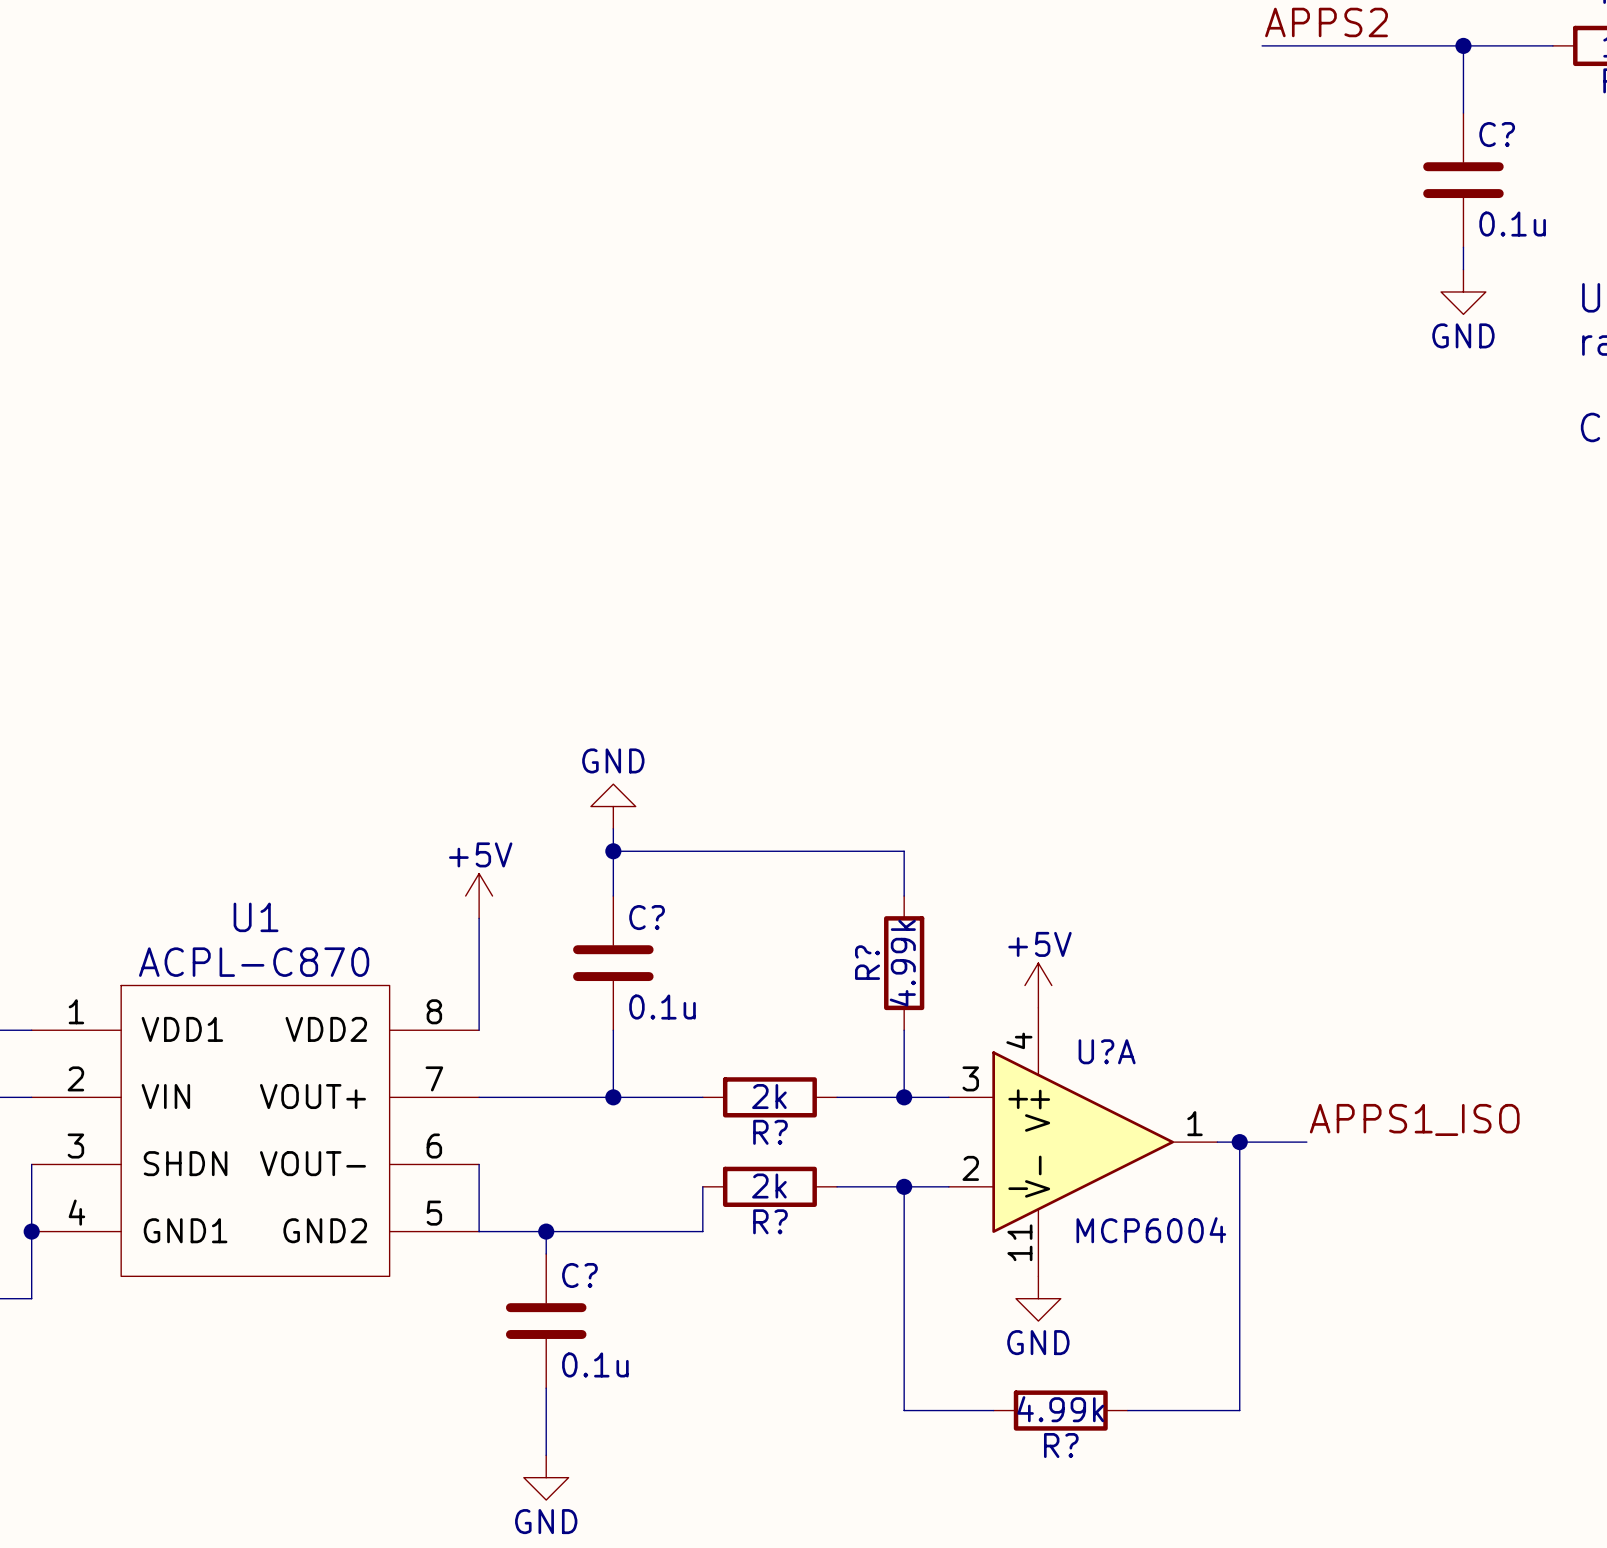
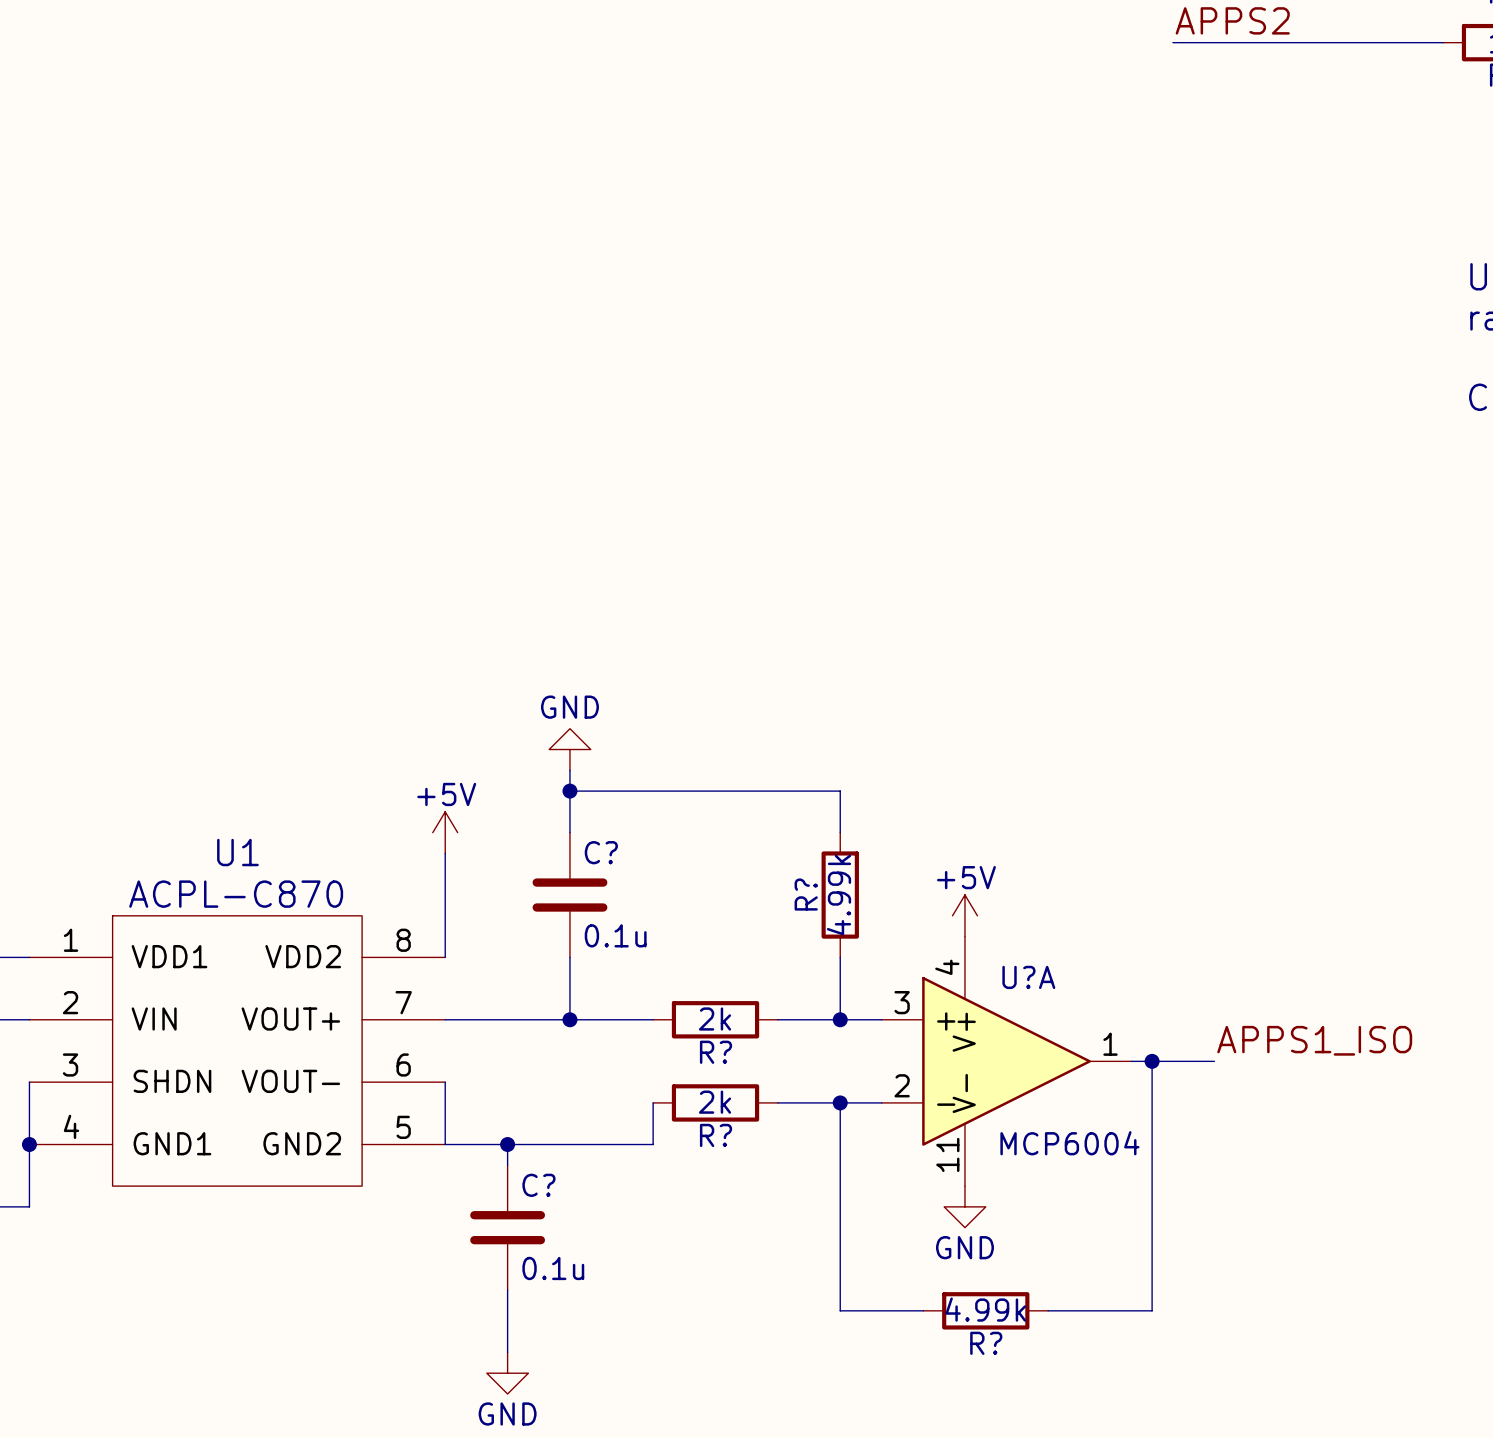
wire: (1463, 45) (1463, 113) -> none
junction: (1463, 45) -> none
C?: 0.1u (1463, 180) -> none
wire: (1463, 247) (1463, 269) -> none
power symbol: GND (1463, 291) -> none

